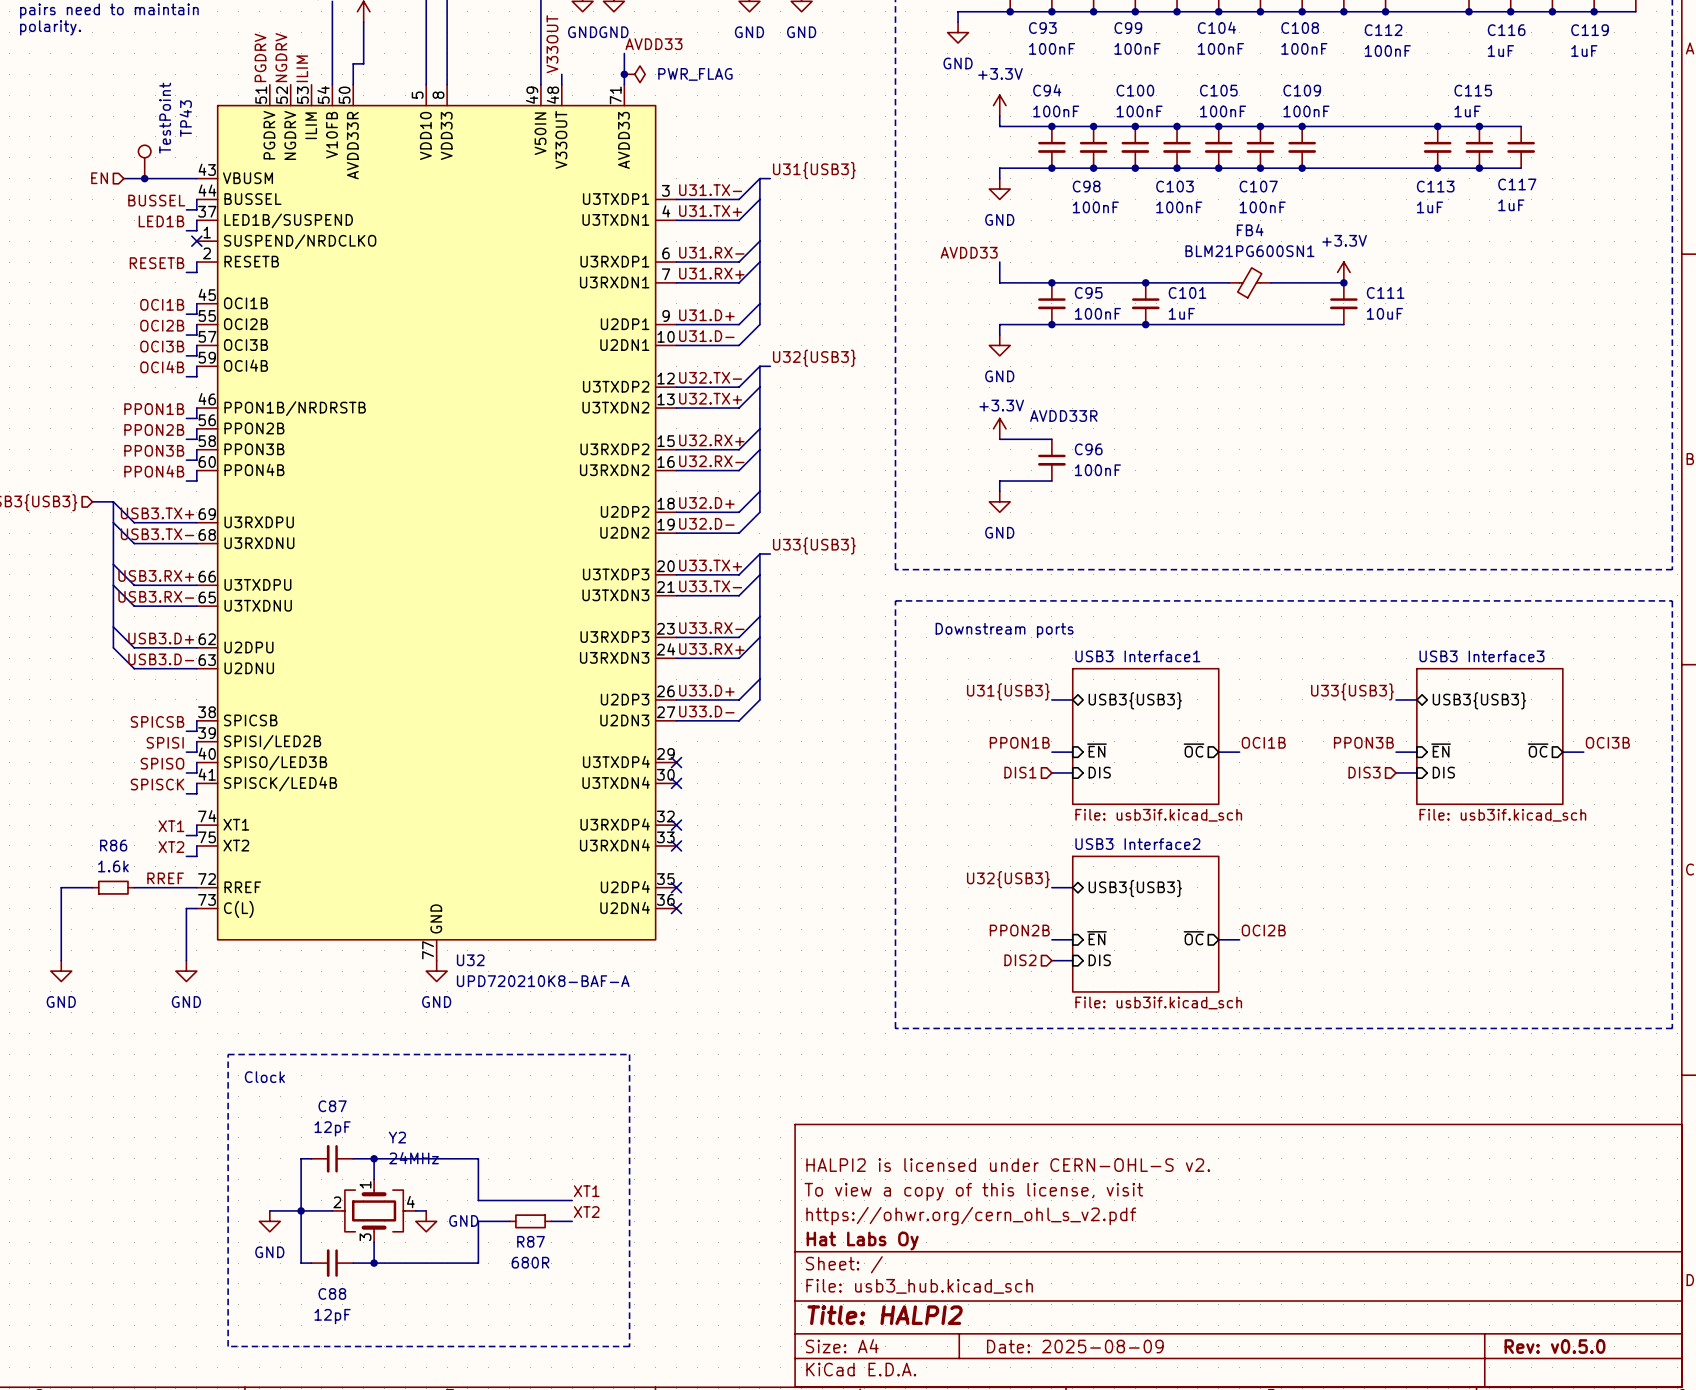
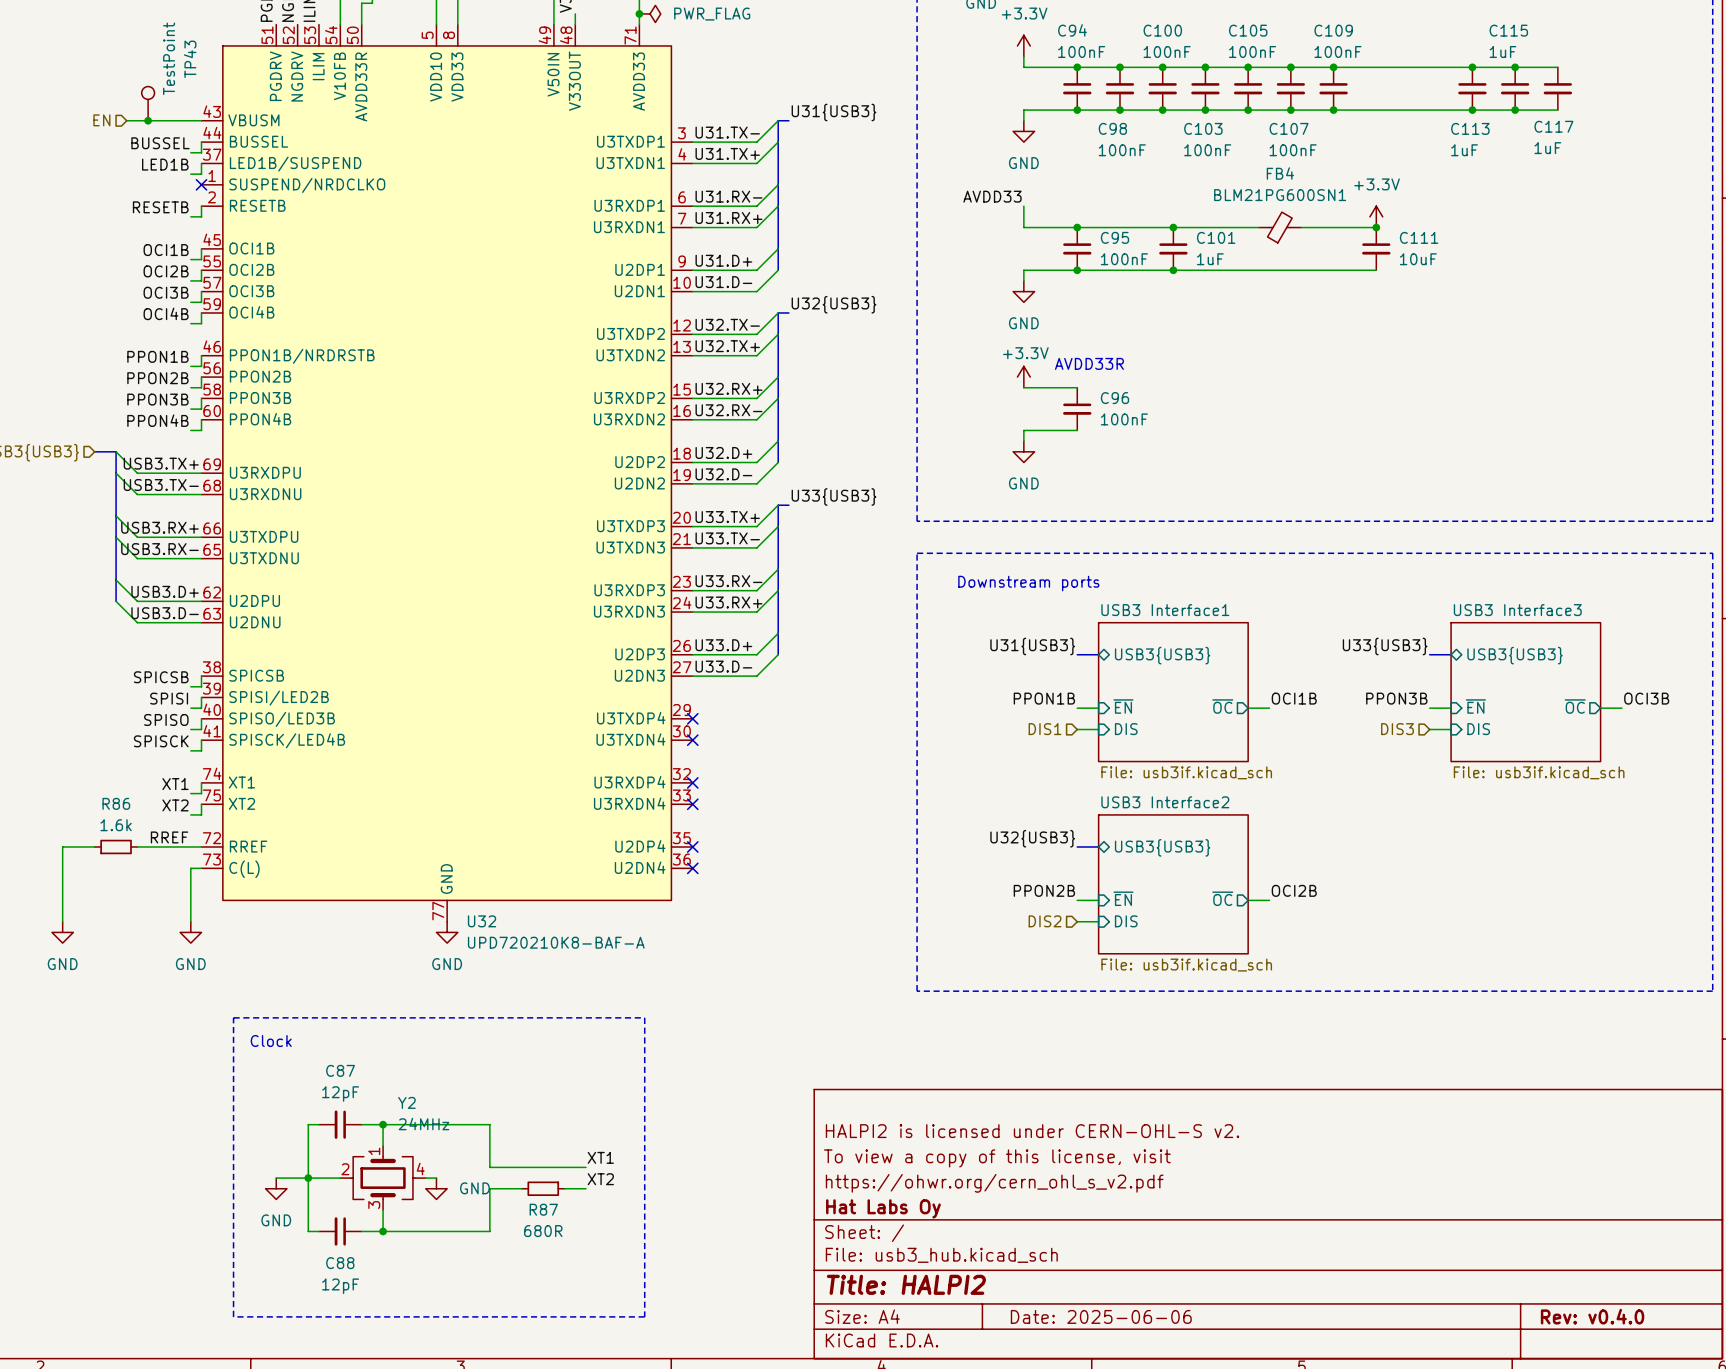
title block: Date: 2025-08-09 (1075, 1346) -> Date: 2025-06-06 (1101, 1316)
title block: Rev: v0.5.0 (1555, 1346) -> Rev: v0.4.0 (1592, 1316)

